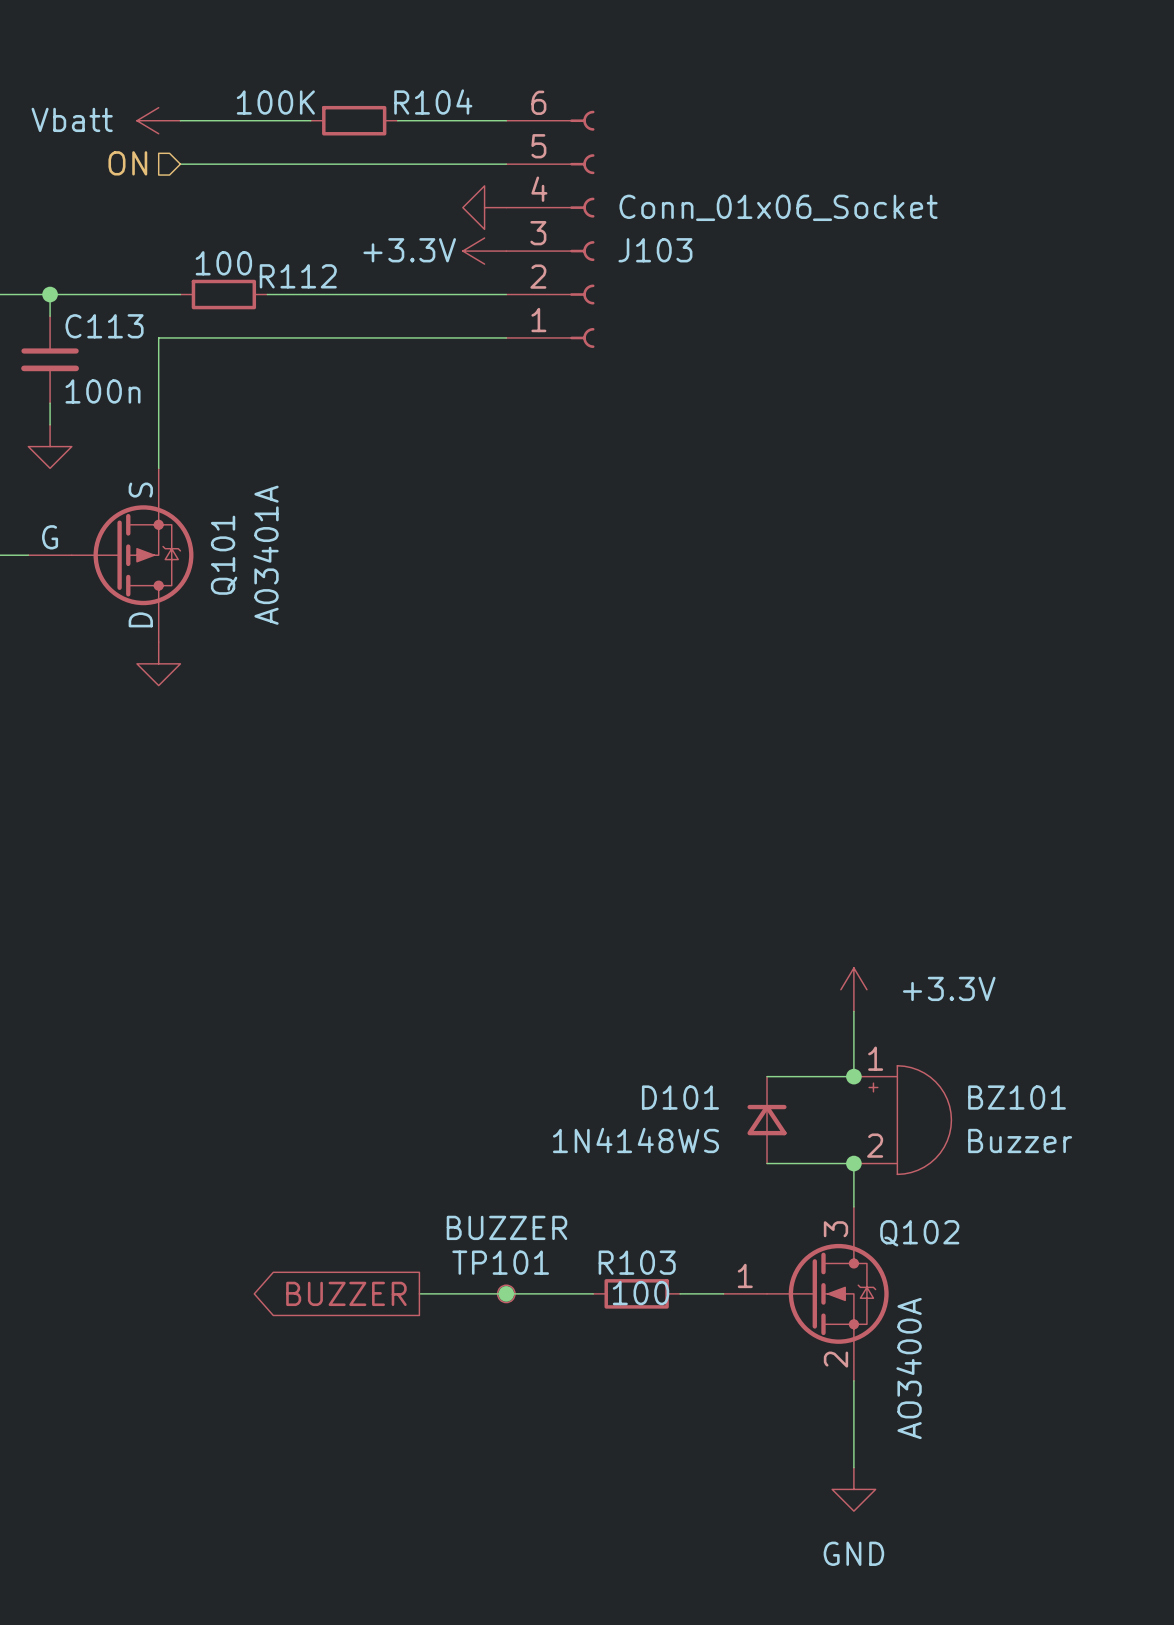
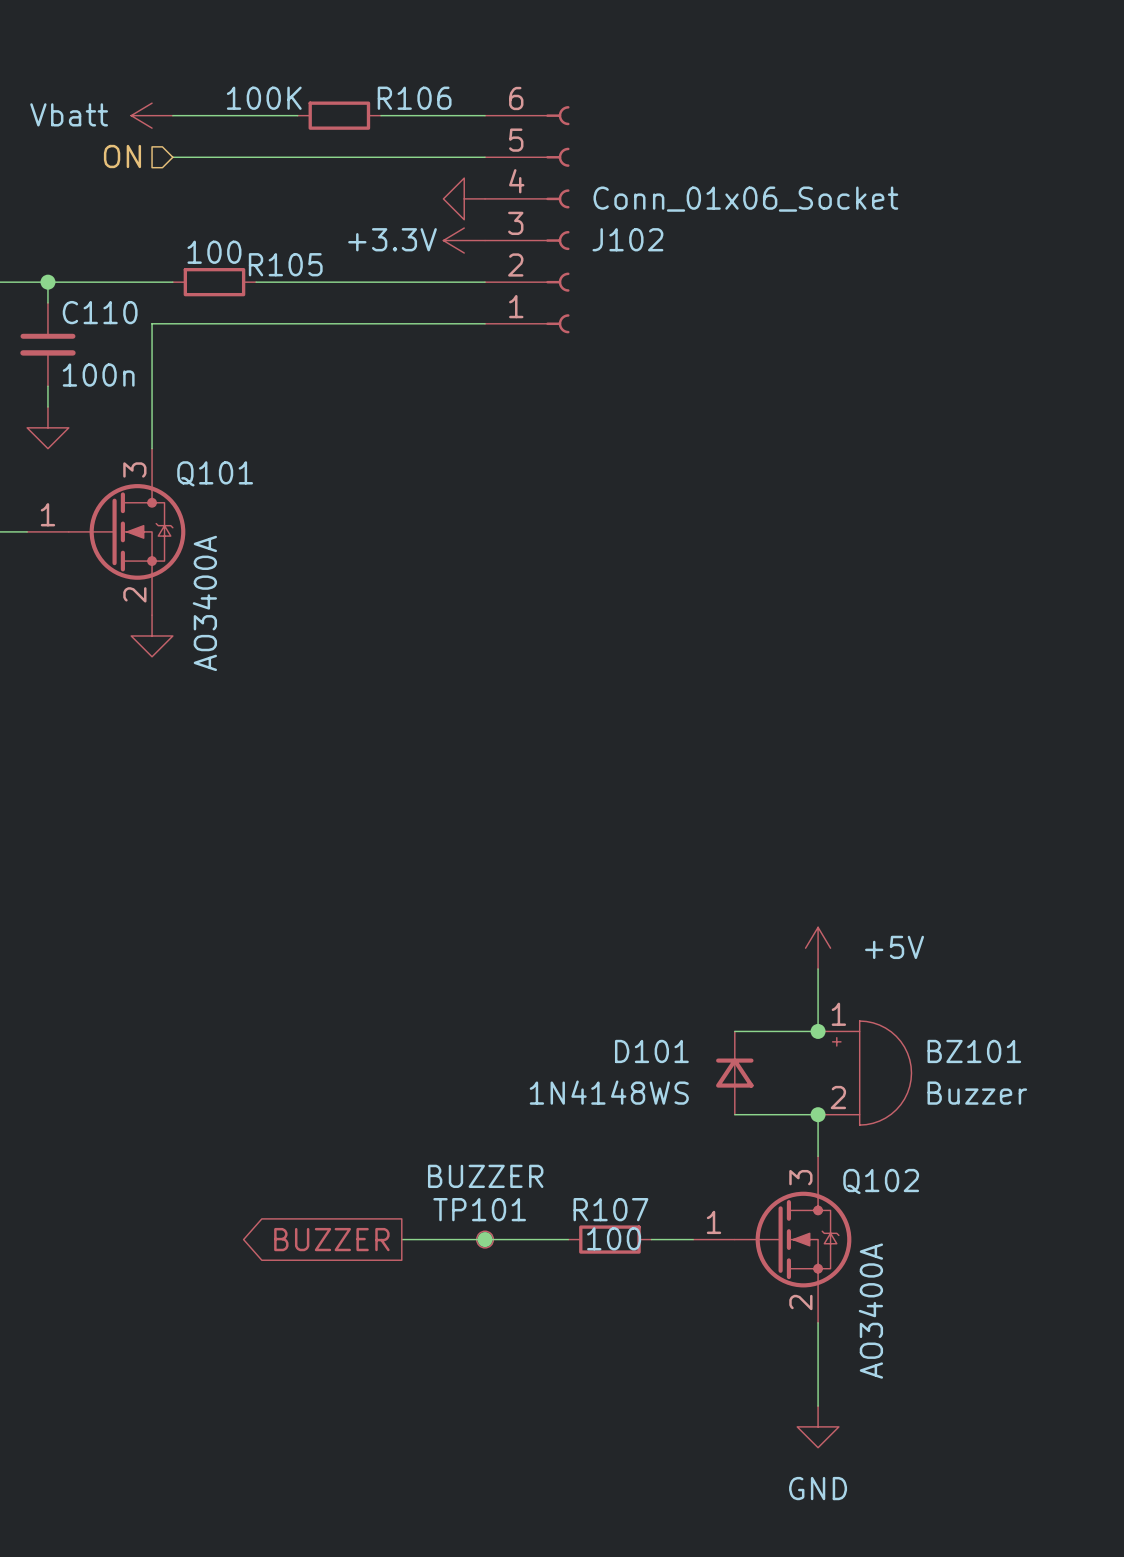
R104 name: R104 (433, 102) -> R106 (414, 98)
J103 name: J103 (655, 250) -> J102 (627, 239)
R112 name: R112 (298, 276) -> R105 (285, 264)
C113 name: C113 (104, 326) -> C110 (100, 312)
Q101 symbol: [28, 468, 194, 643] -> [27, 448, 186, 616]
Q101 name position: Q101 (224, 555) -> Q101 (215, 473)
Q101 value: A03401A (265, 555) -> AO3400A (204, 603)
power symbol: +3.3V (853, 989) -> +5V (818, 948)
R103 name: R103 (637, 1262) -> R107 (610, 1209)

